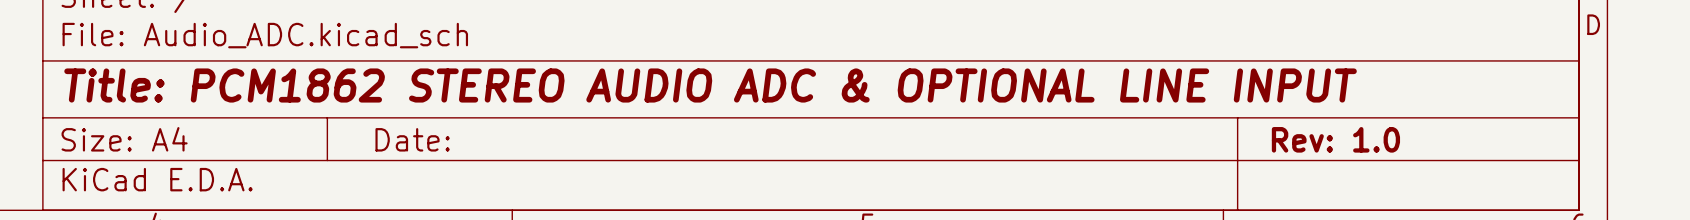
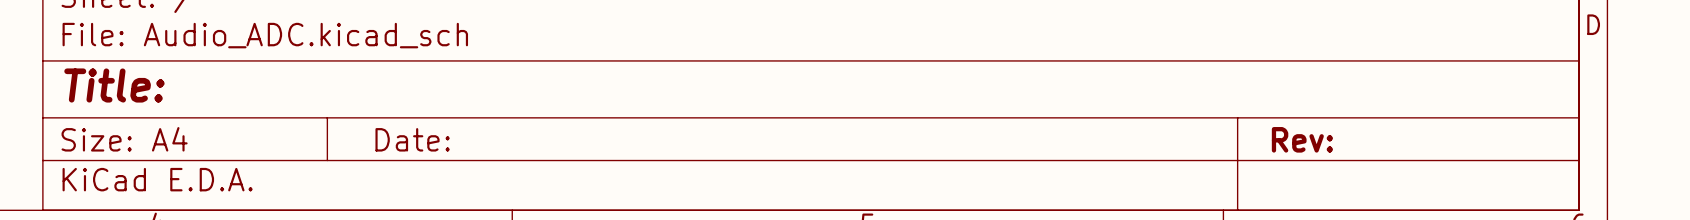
title block: Title: PCM1862 STEREO AUDIO ADC & OPTIONAL LINE INPUT (710, 85) -> Title: (114, 85)
title block: Rev: 1.0 (1335, 139) -> Rev: (1302, 139)

